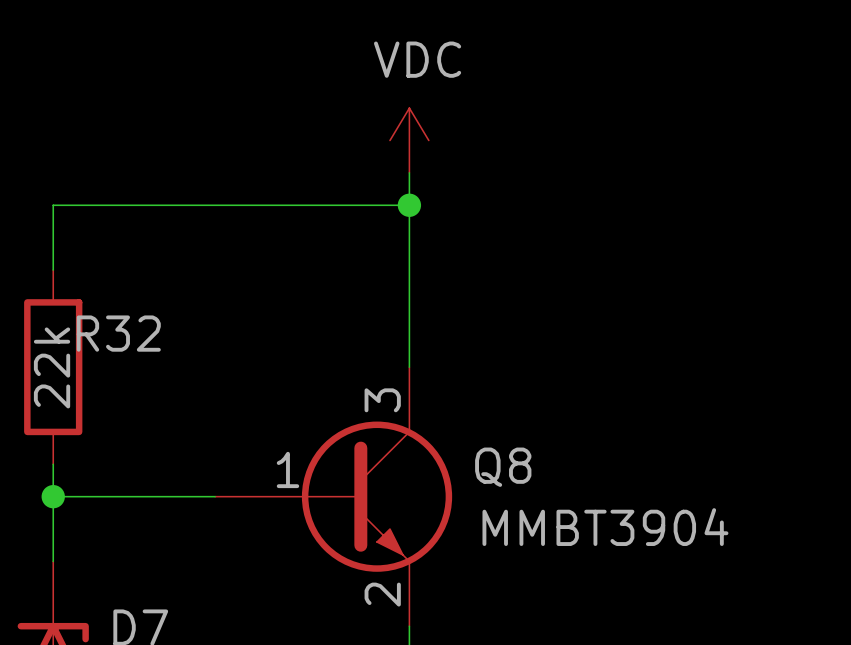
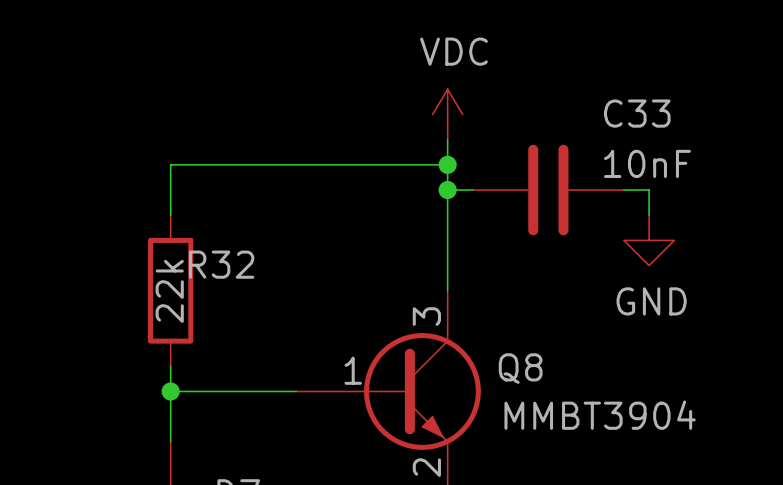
wire: none -> (447, 190) (472, 190)
junction: none -> (447, 190)
C33: none -> 10nF (548, 190)
wire: none -> (623, 190) (649, 190) (649, 215)
power symbol: none -> GND (649, 240)

